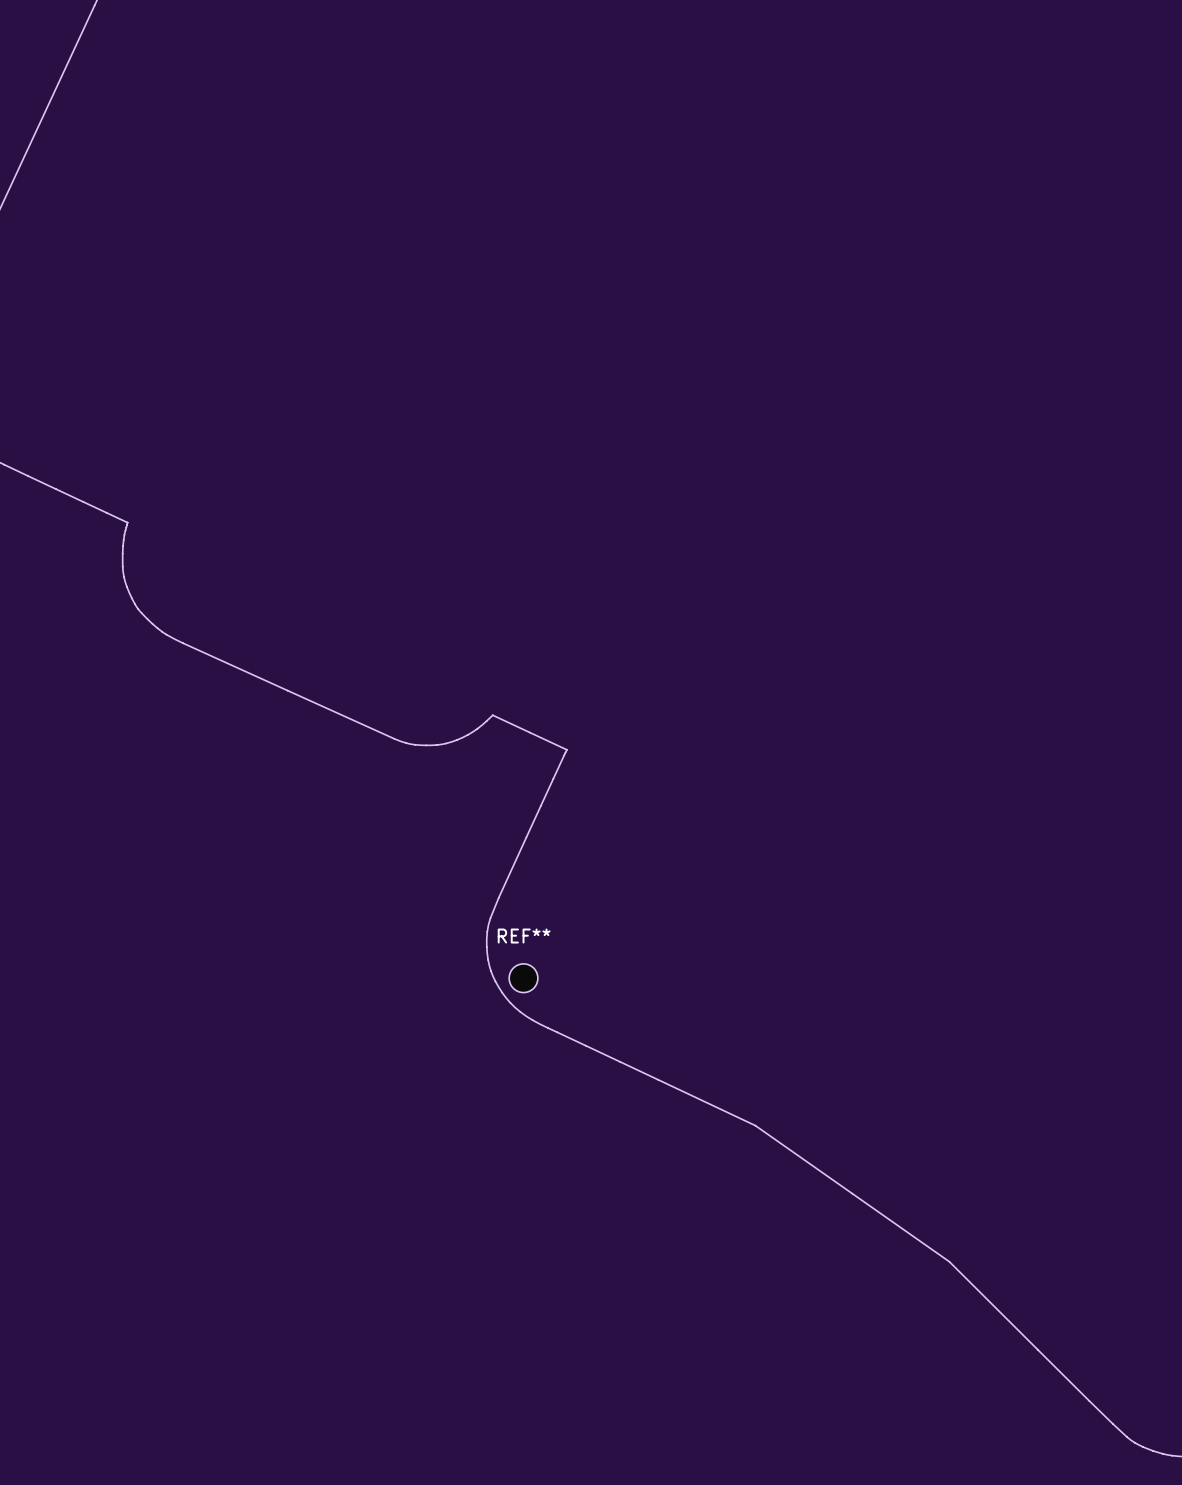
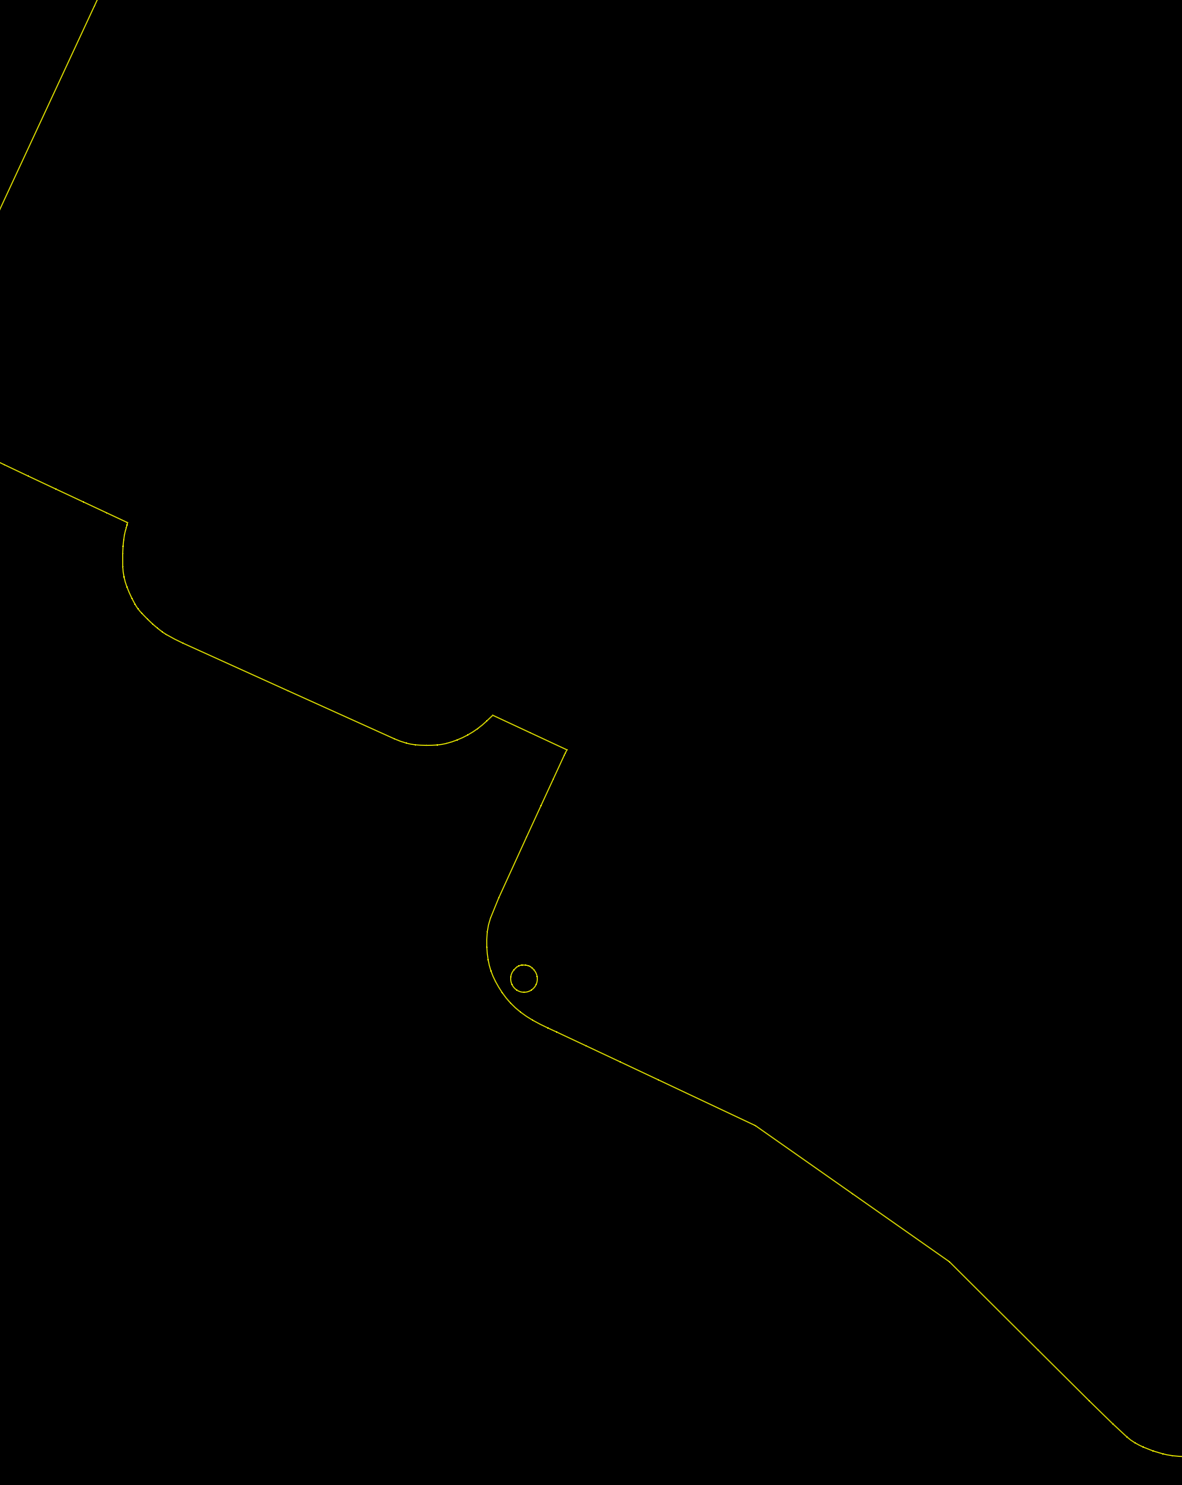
board edge: none -> (521, 965) (530, 966) (537, 976) (535, 986) (526, 992) (516, 990) (510, 980) (512, 971) (521, 965)
REF**: (523, 978) -> none

